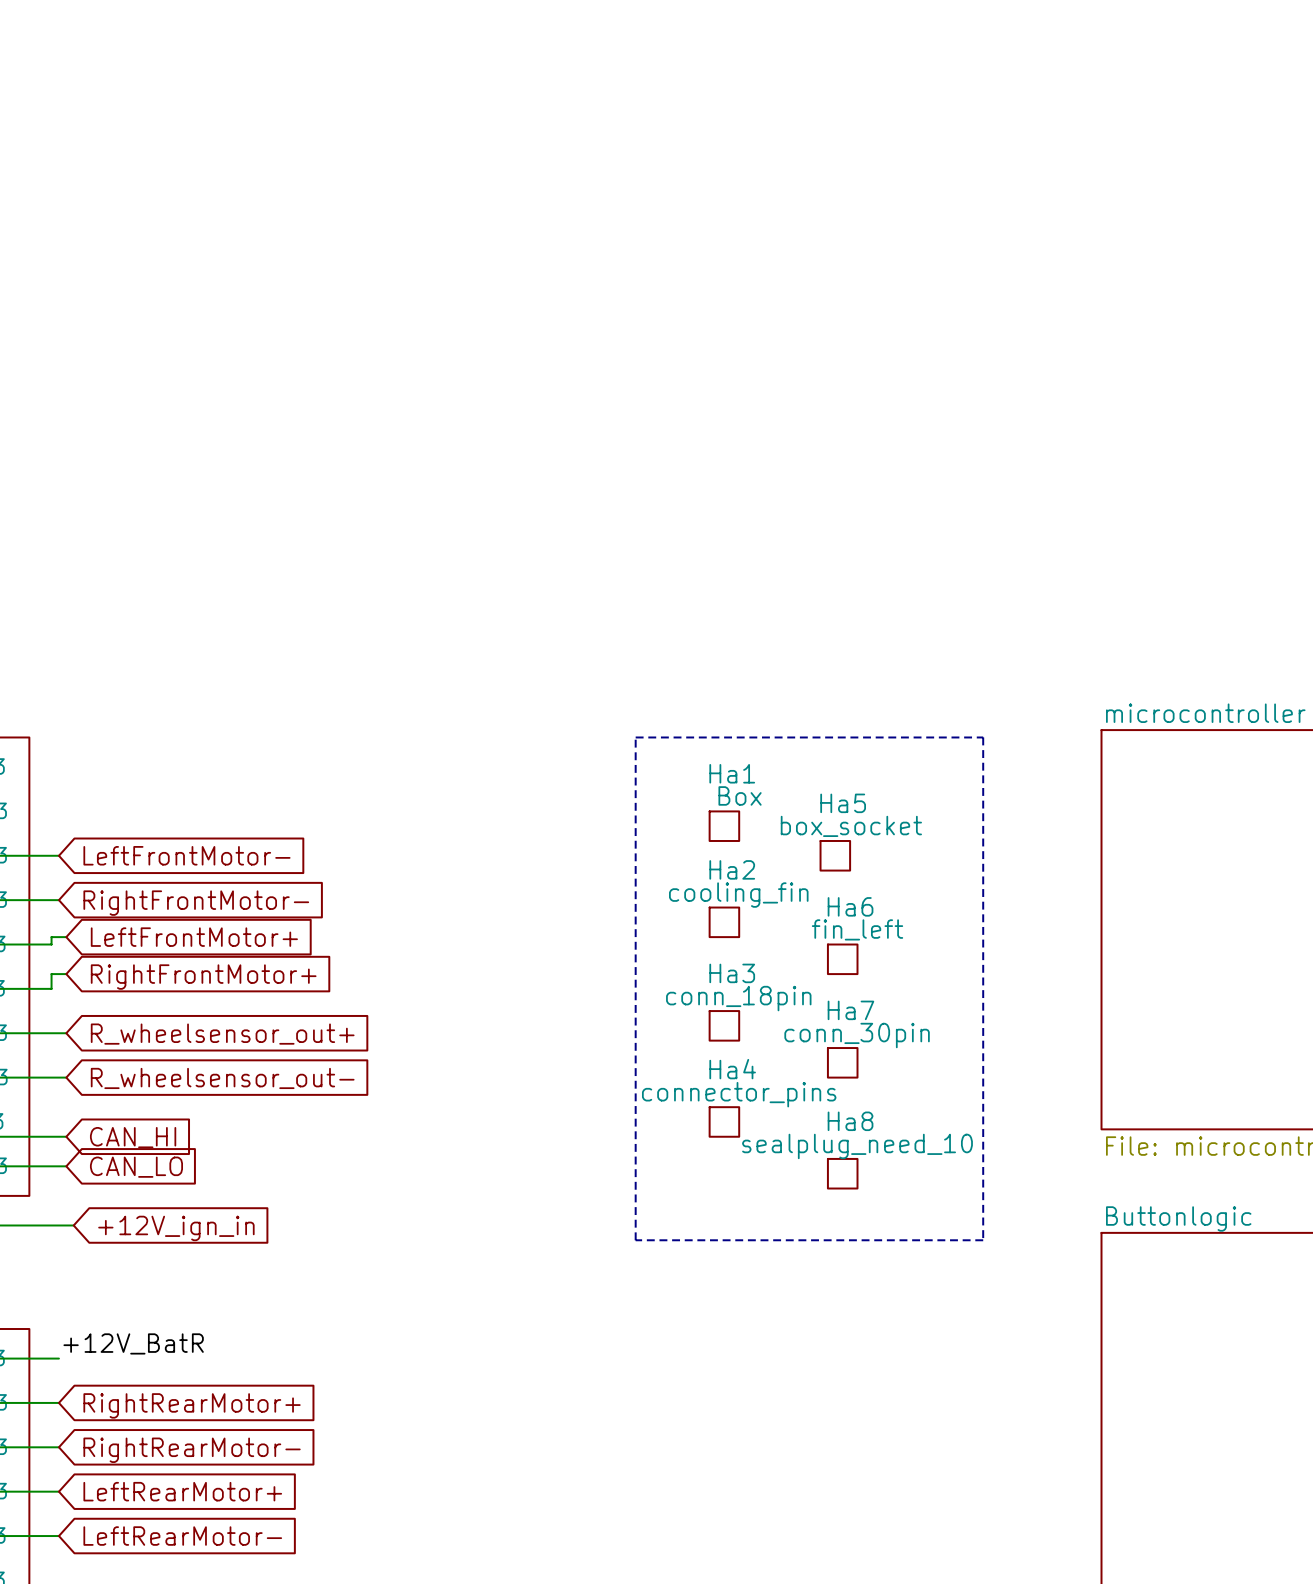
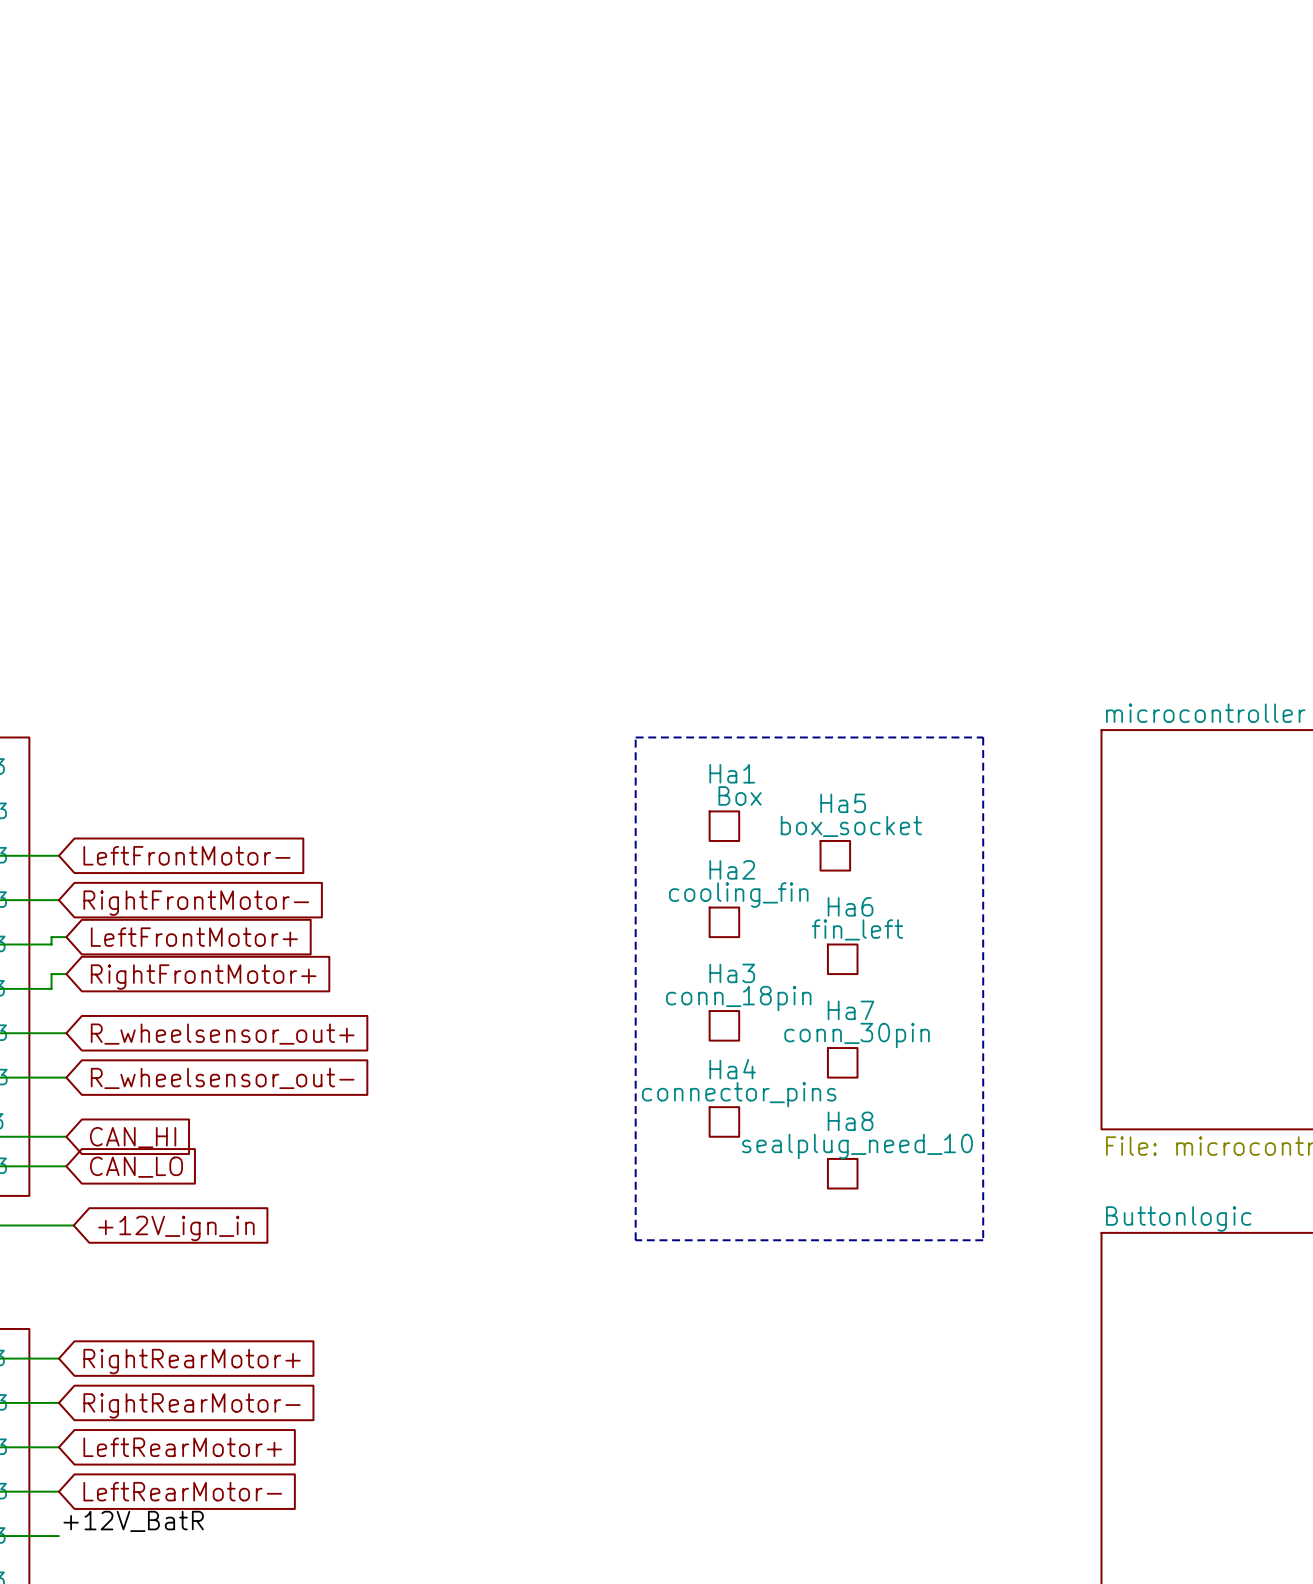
label position: +12V_BatR (133, 1343) -> +12V_BatR (133, 1521)
global label: none -> RightRearMotor+ (192, 1361)
global label: RightRearMotor+ (192, 1405) -> RightRearMotor- (192, 1405)
global label: RightRearMotor- (192, 1450) -> LeftRearMotor+ (182, 1447)
global label: LeftRearMotor+ (182, 1491) -> LeftRearMotor- (182, 1491)
global label: LeftRearMotor- (182, 1536) -> none

